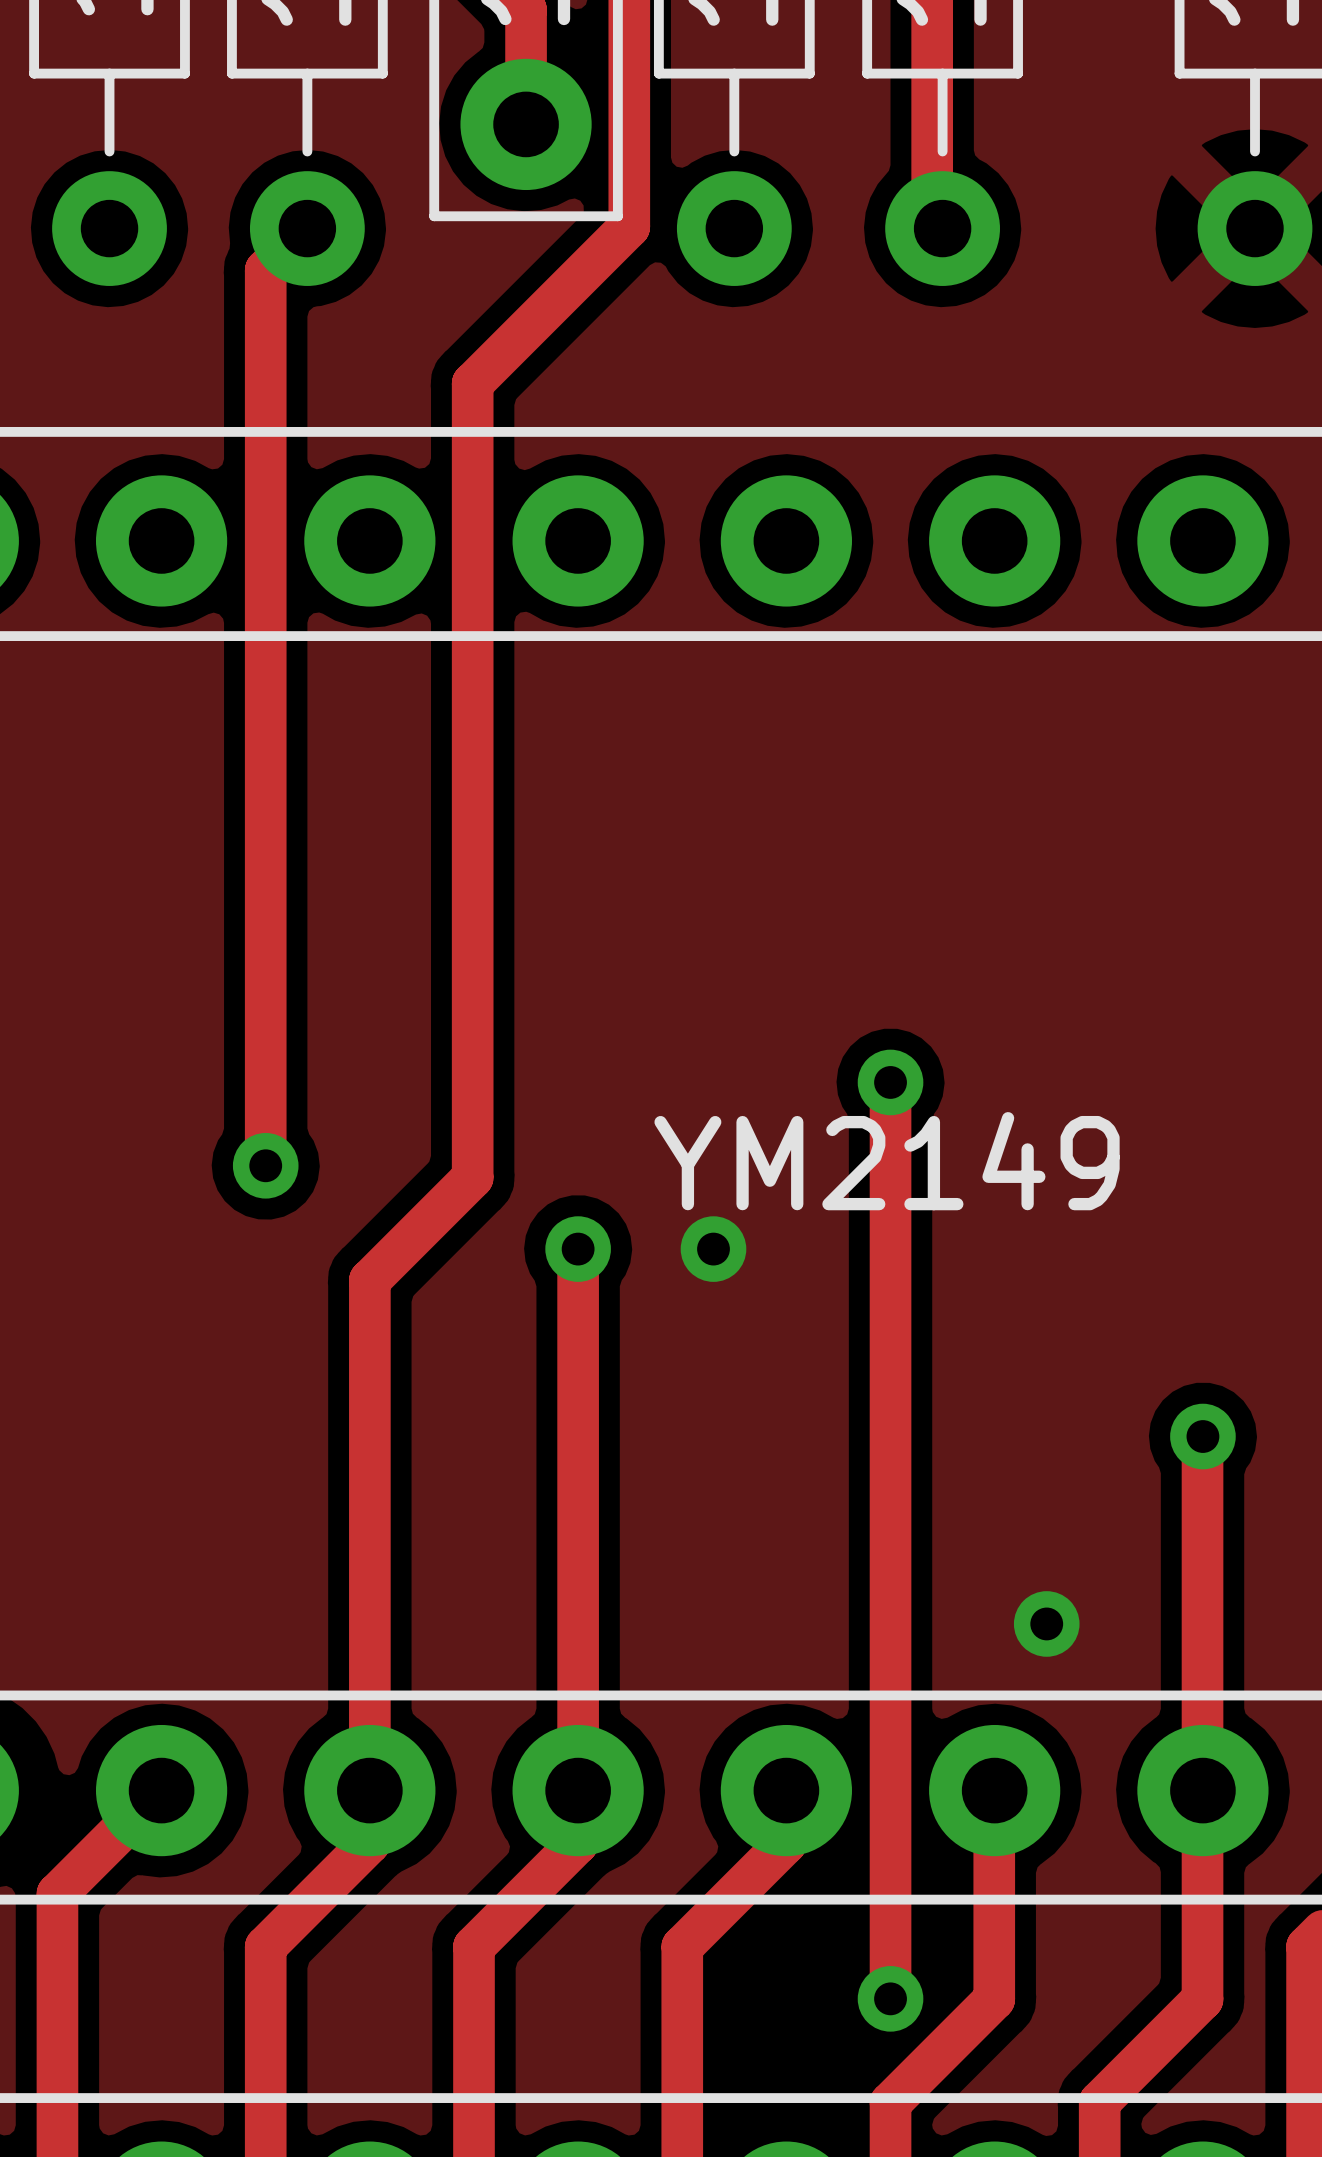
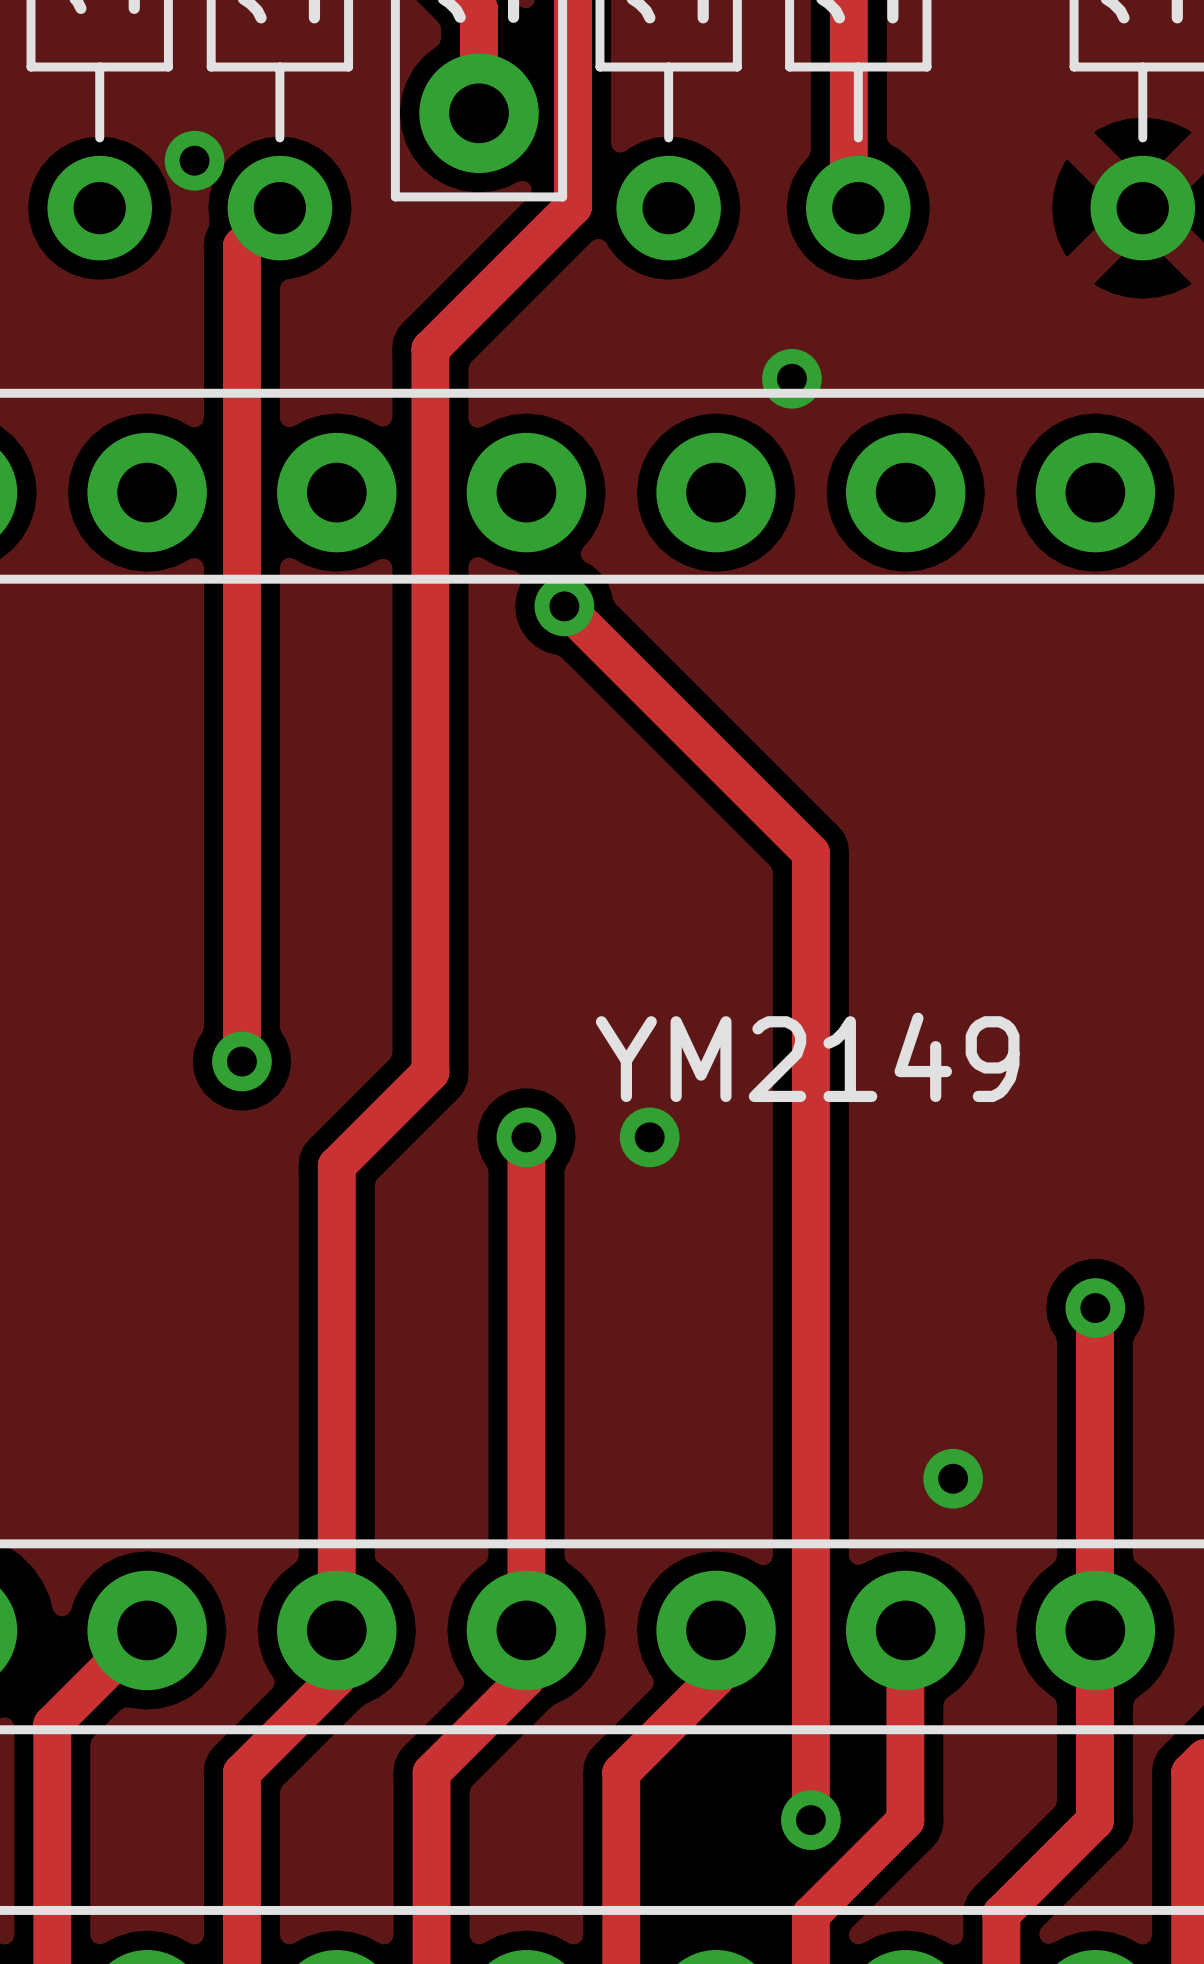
via: none -> (194, 160)
via: none -> (791, 378)
track: none -> (564, 606) (810, 852) (810, 985)
via: none -> (564, 606)
via: (890, 1082) -> none

